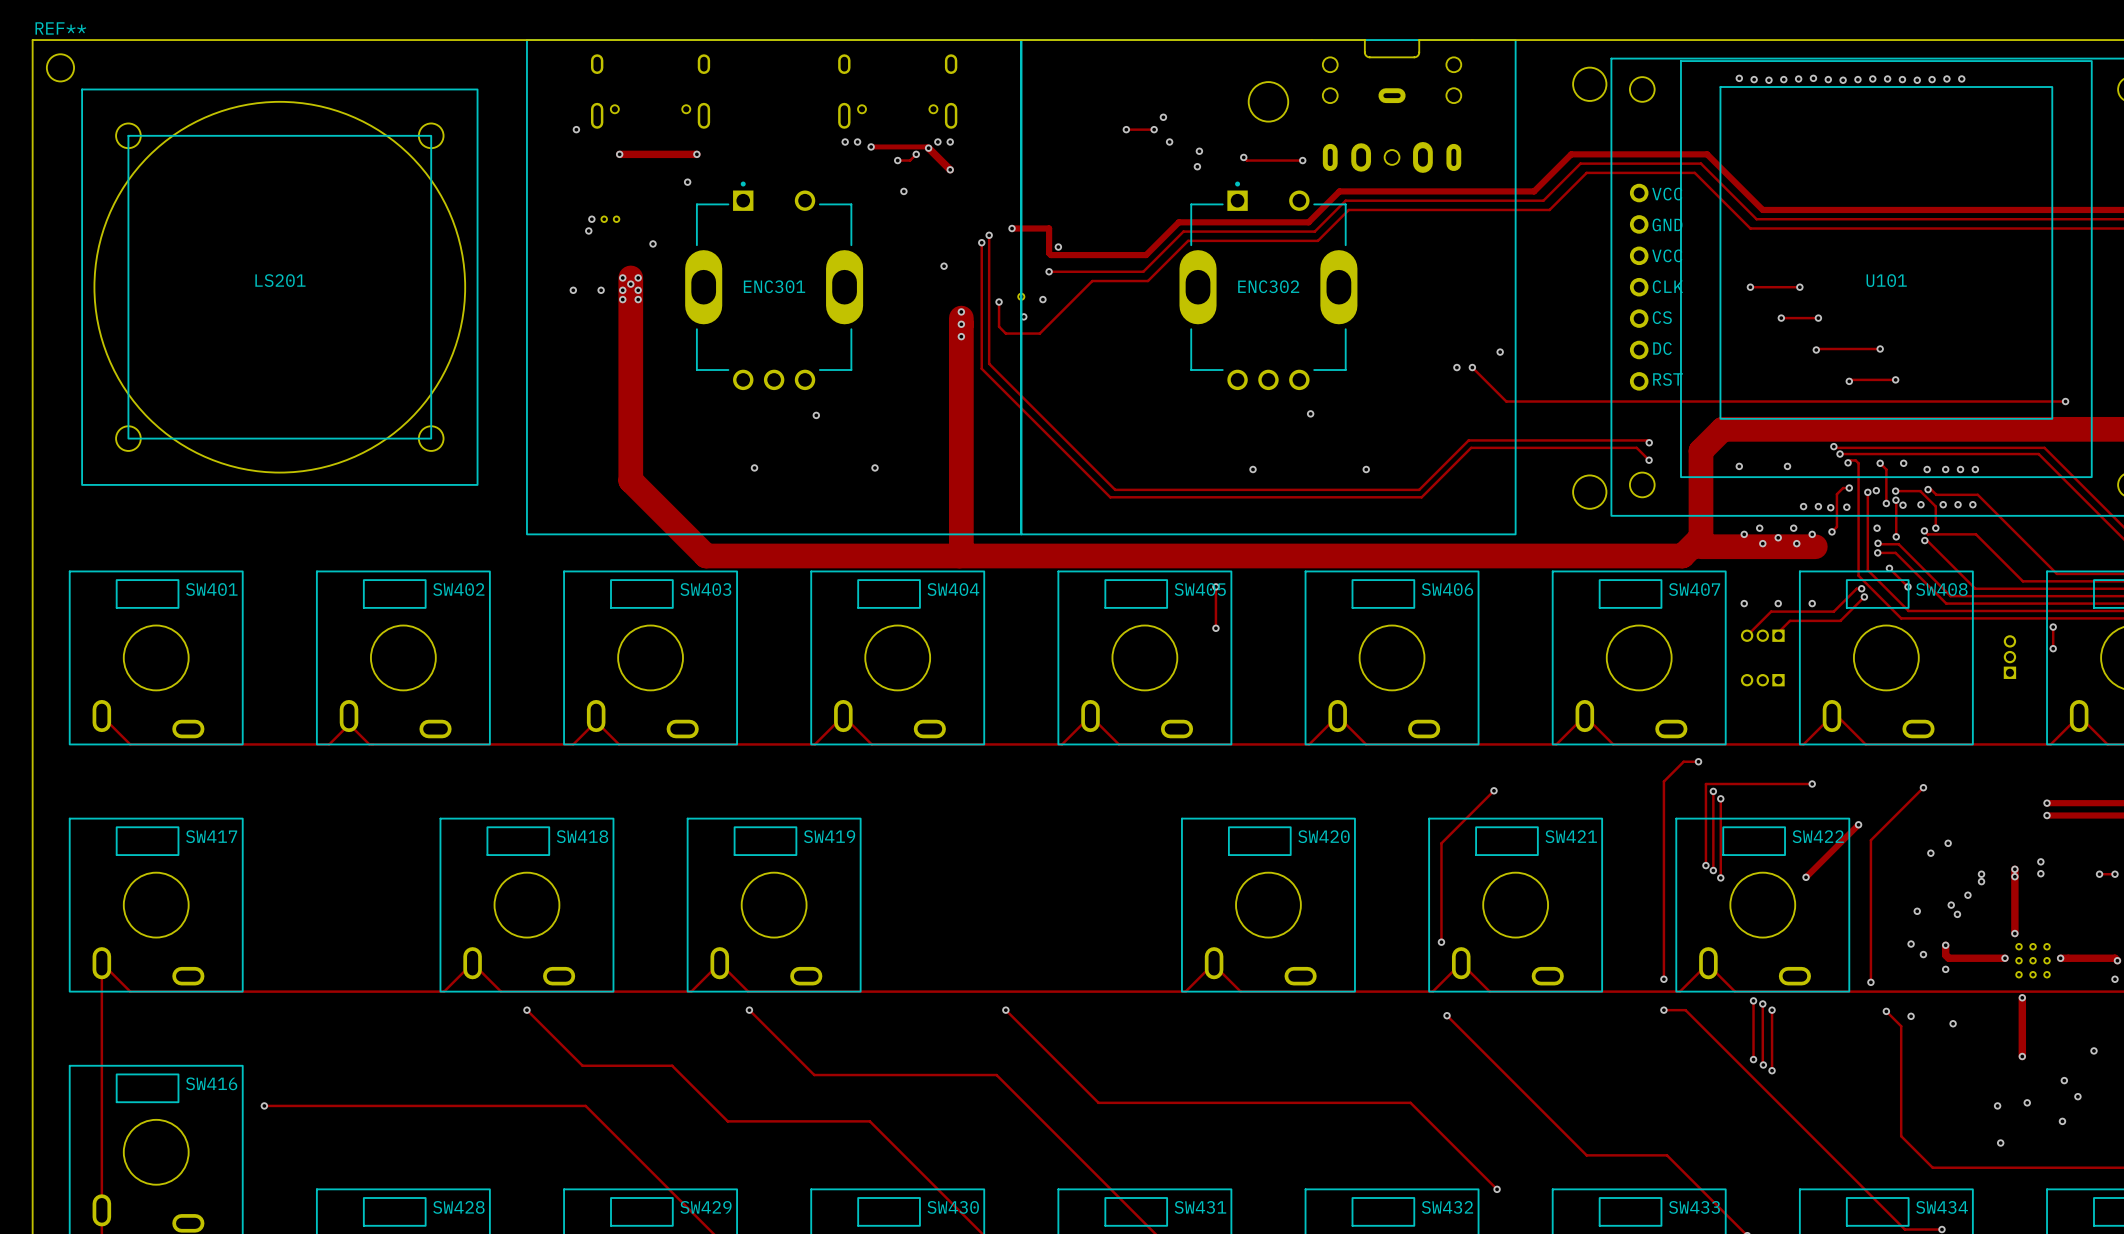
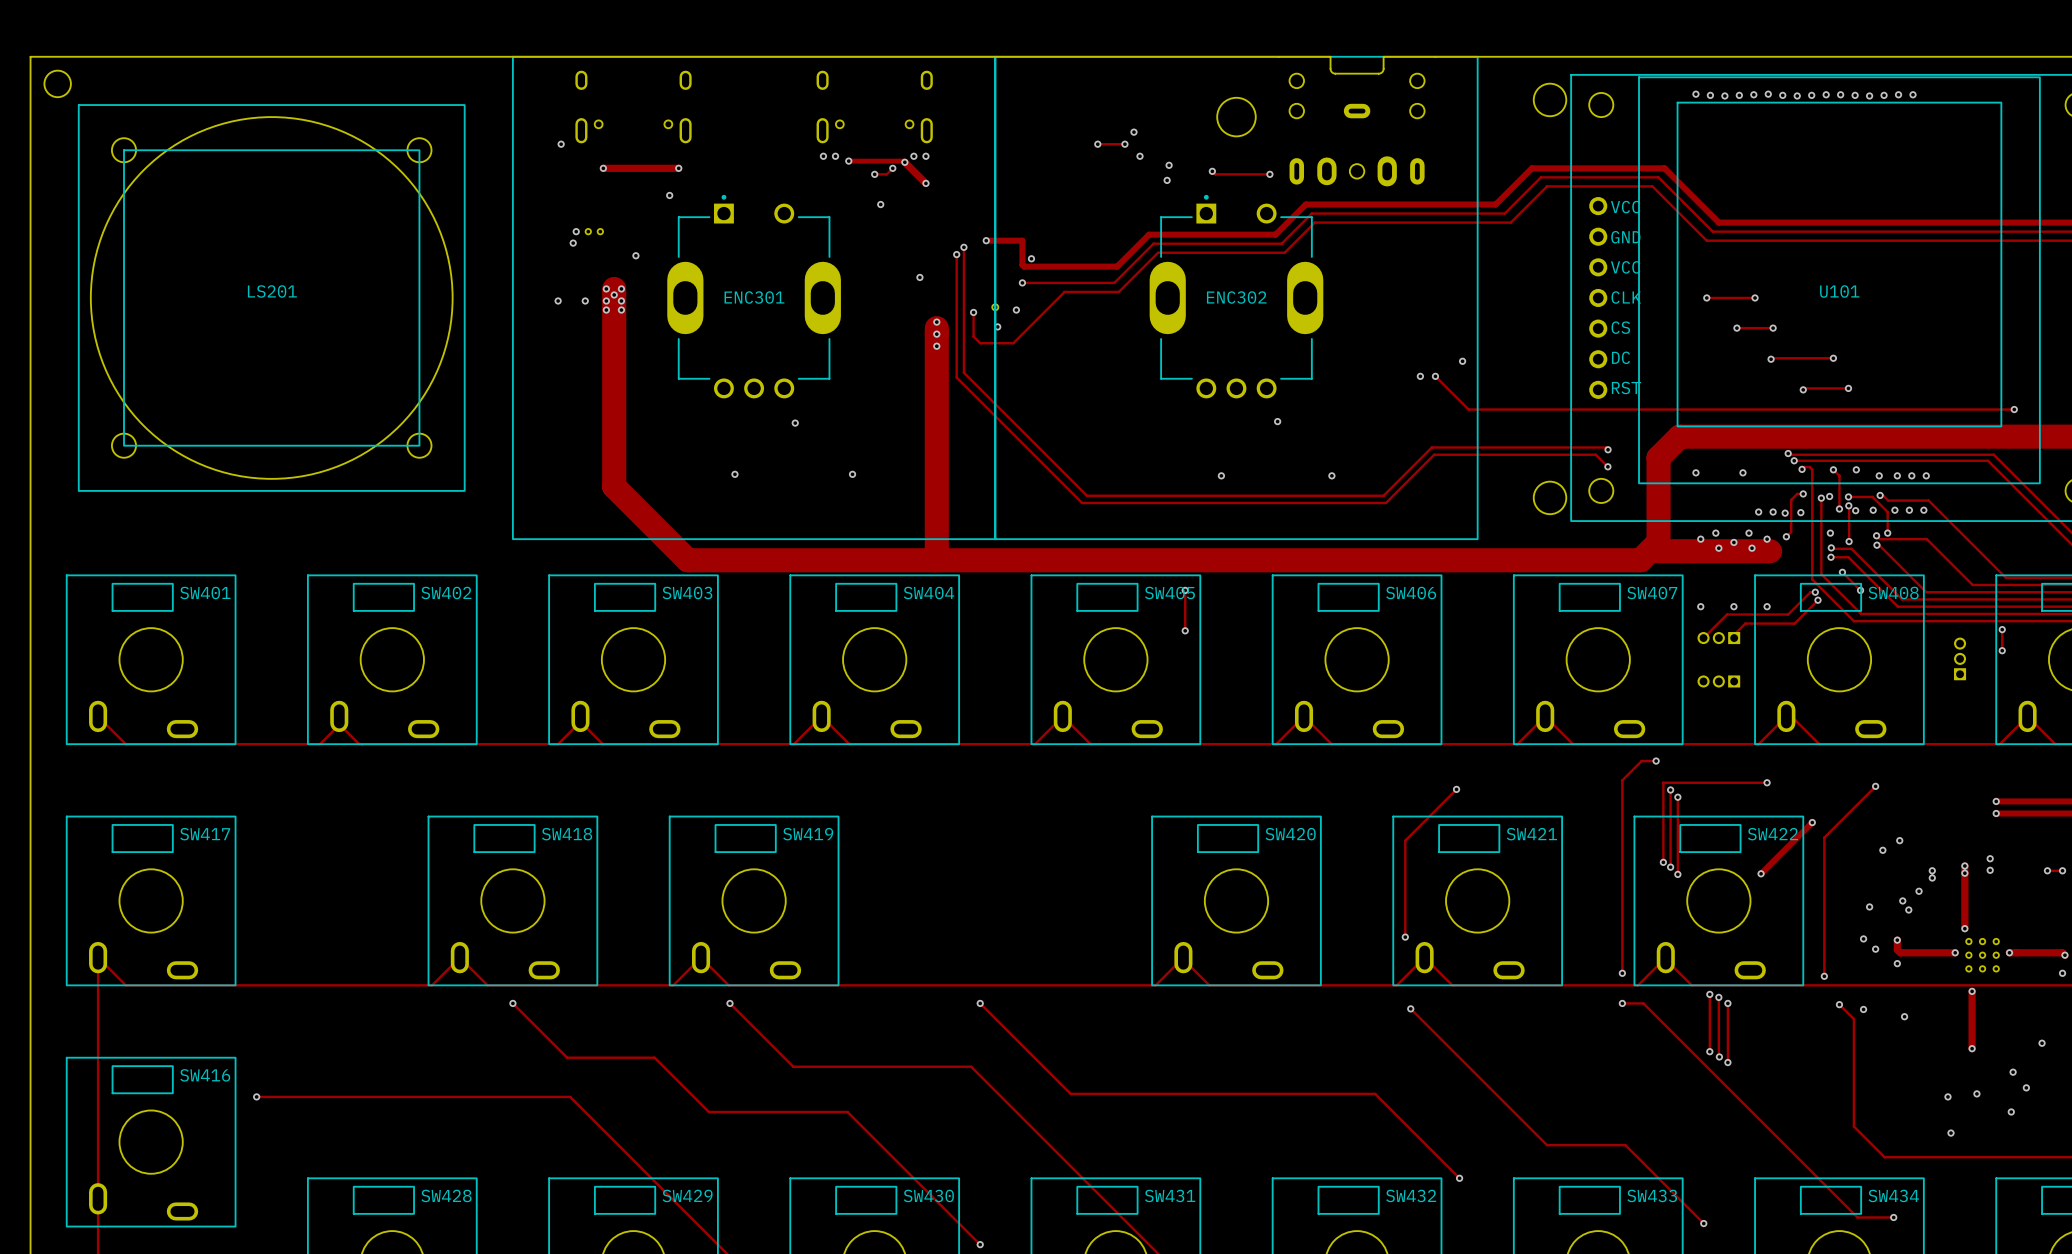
REF** name: REF** (60, 28) -> none

